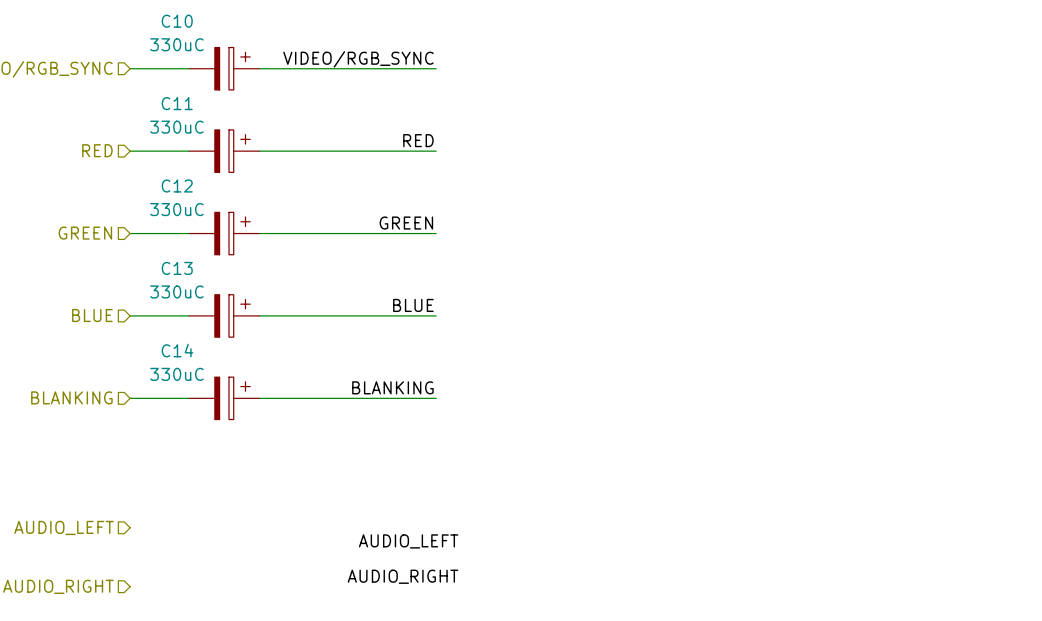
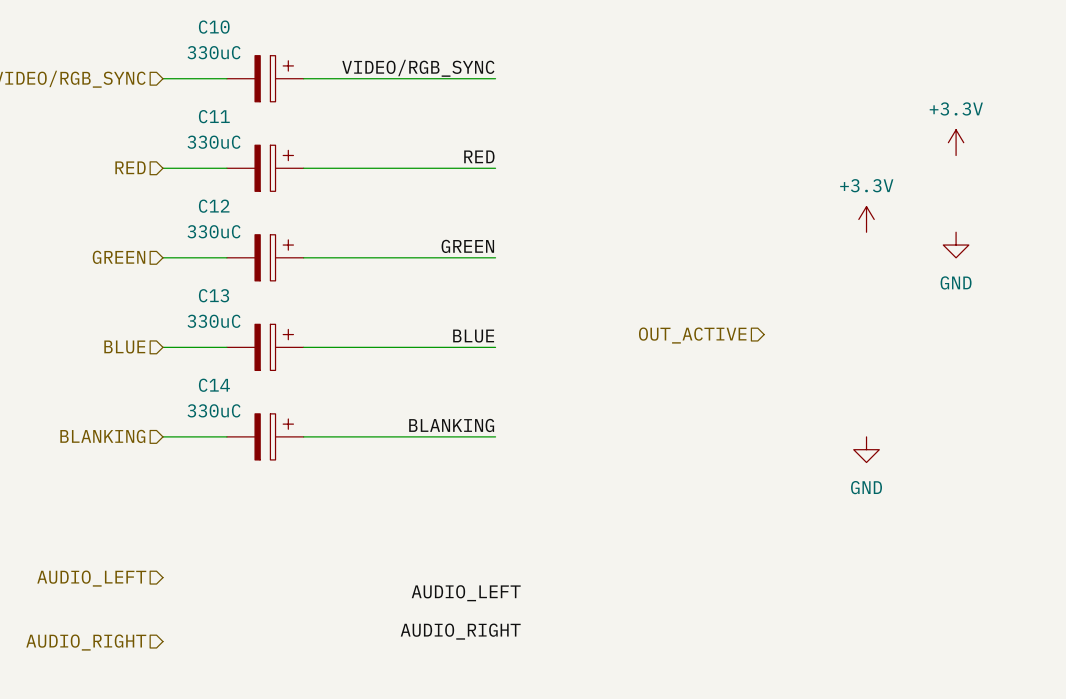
power symbol: none -> +3.3V (956, 142)
power symbol: none -> +3.3V (866, 219)
power symbol: none -> GND (956, 245)
hierarchical label: none -> OUT_ACTIVE (692, 335)
power symbol: none -> GND (866, 449)

